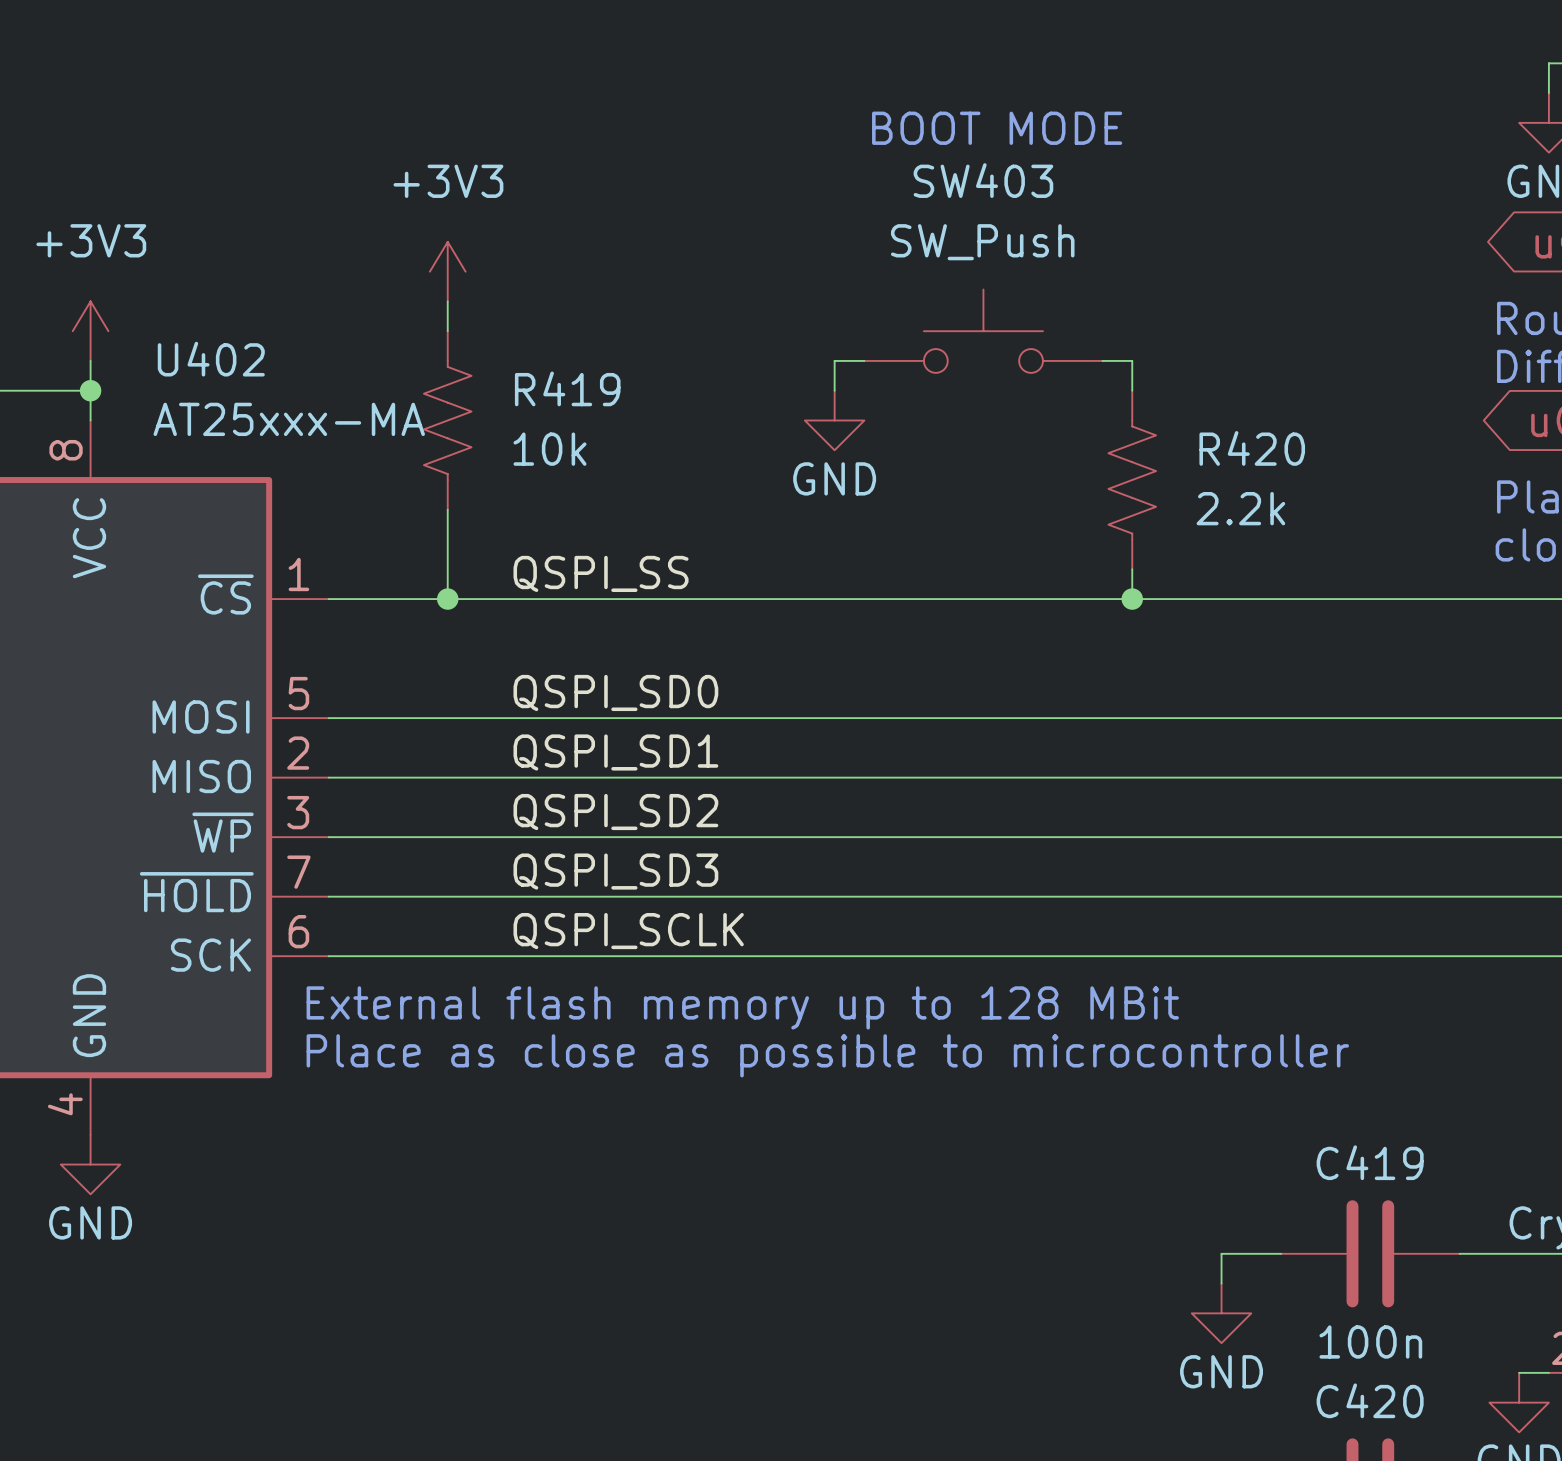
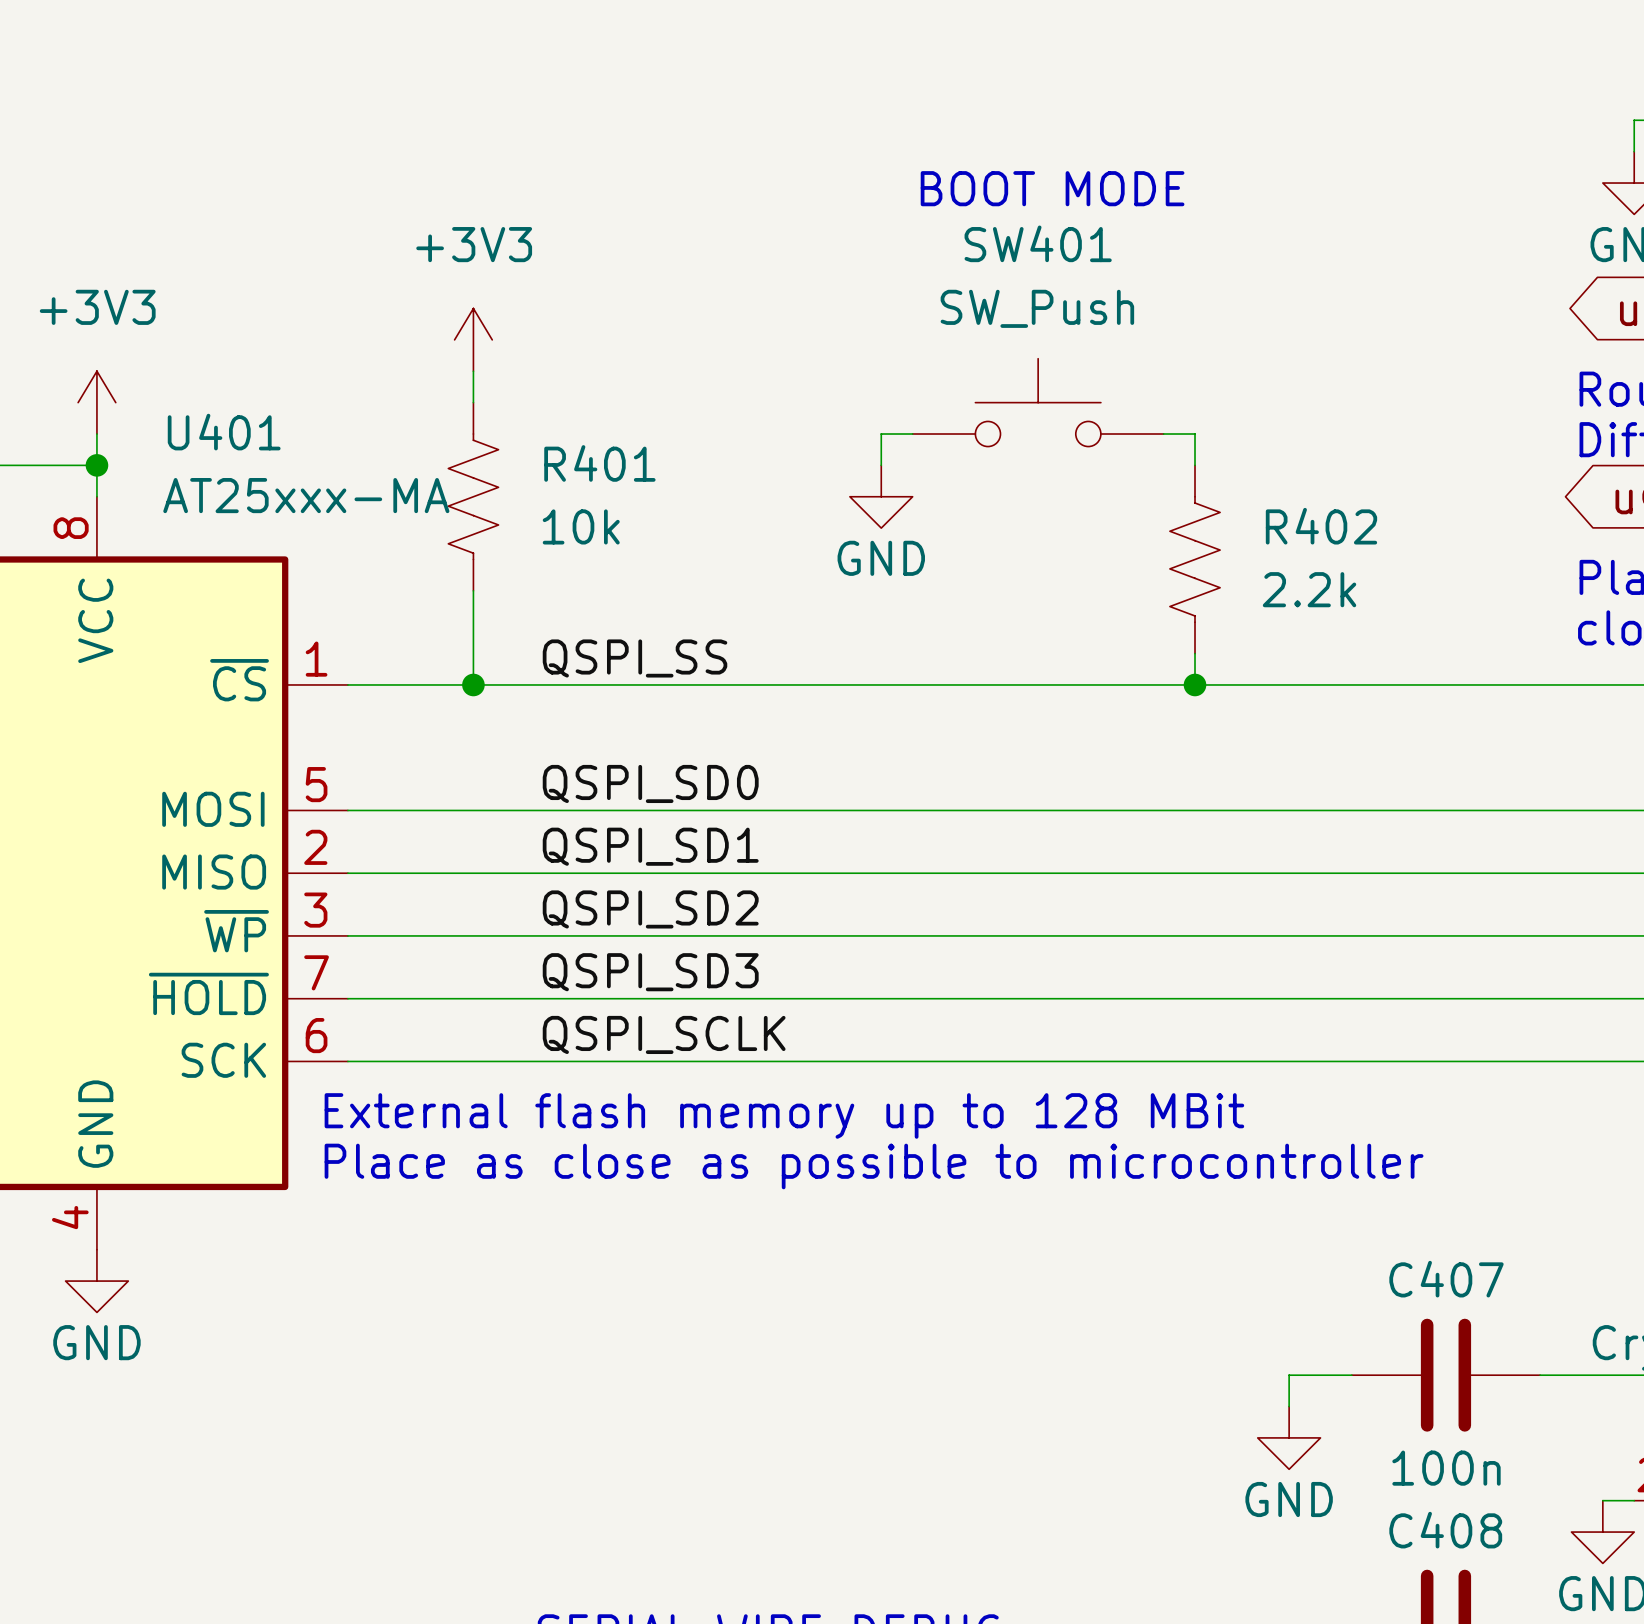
SW403 name: SW403 (983, 180) -> SW401 (1038, 243)
U402 name: U402 (211, 359) -> U401 (224, 432)
R419 name: R419 (567, 388) -> R401 (599, 463)
R420 name: R420 (1252, 448) -> R402 (1321, 526)
C419 name: C419 (1370, 1162) -> C407 (1446, 1279)
C420 name: C420 (1370, 1400) -> C408 (1445, 1530)

